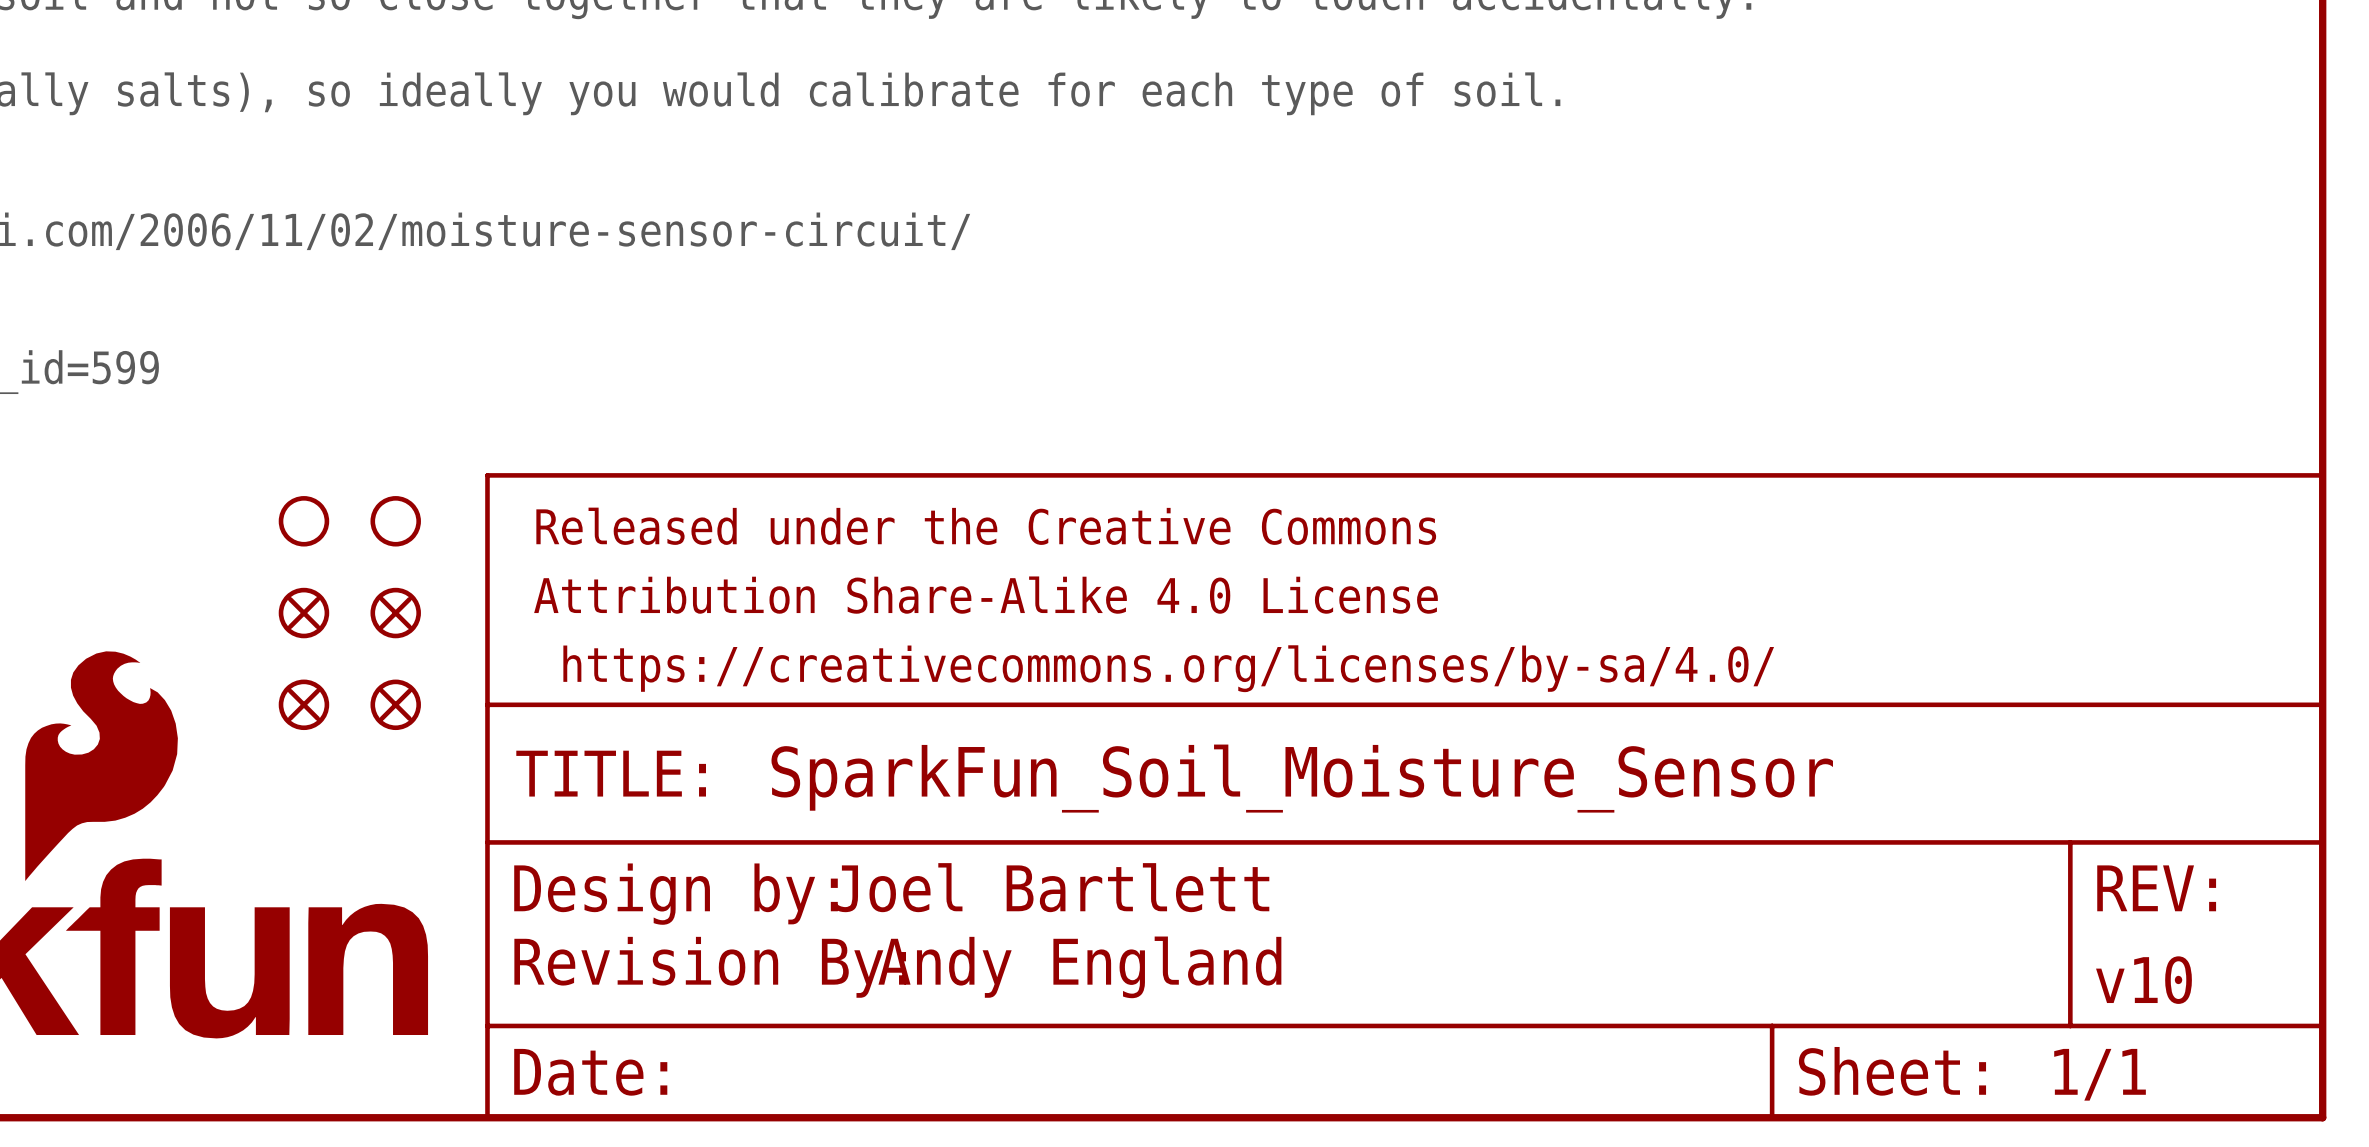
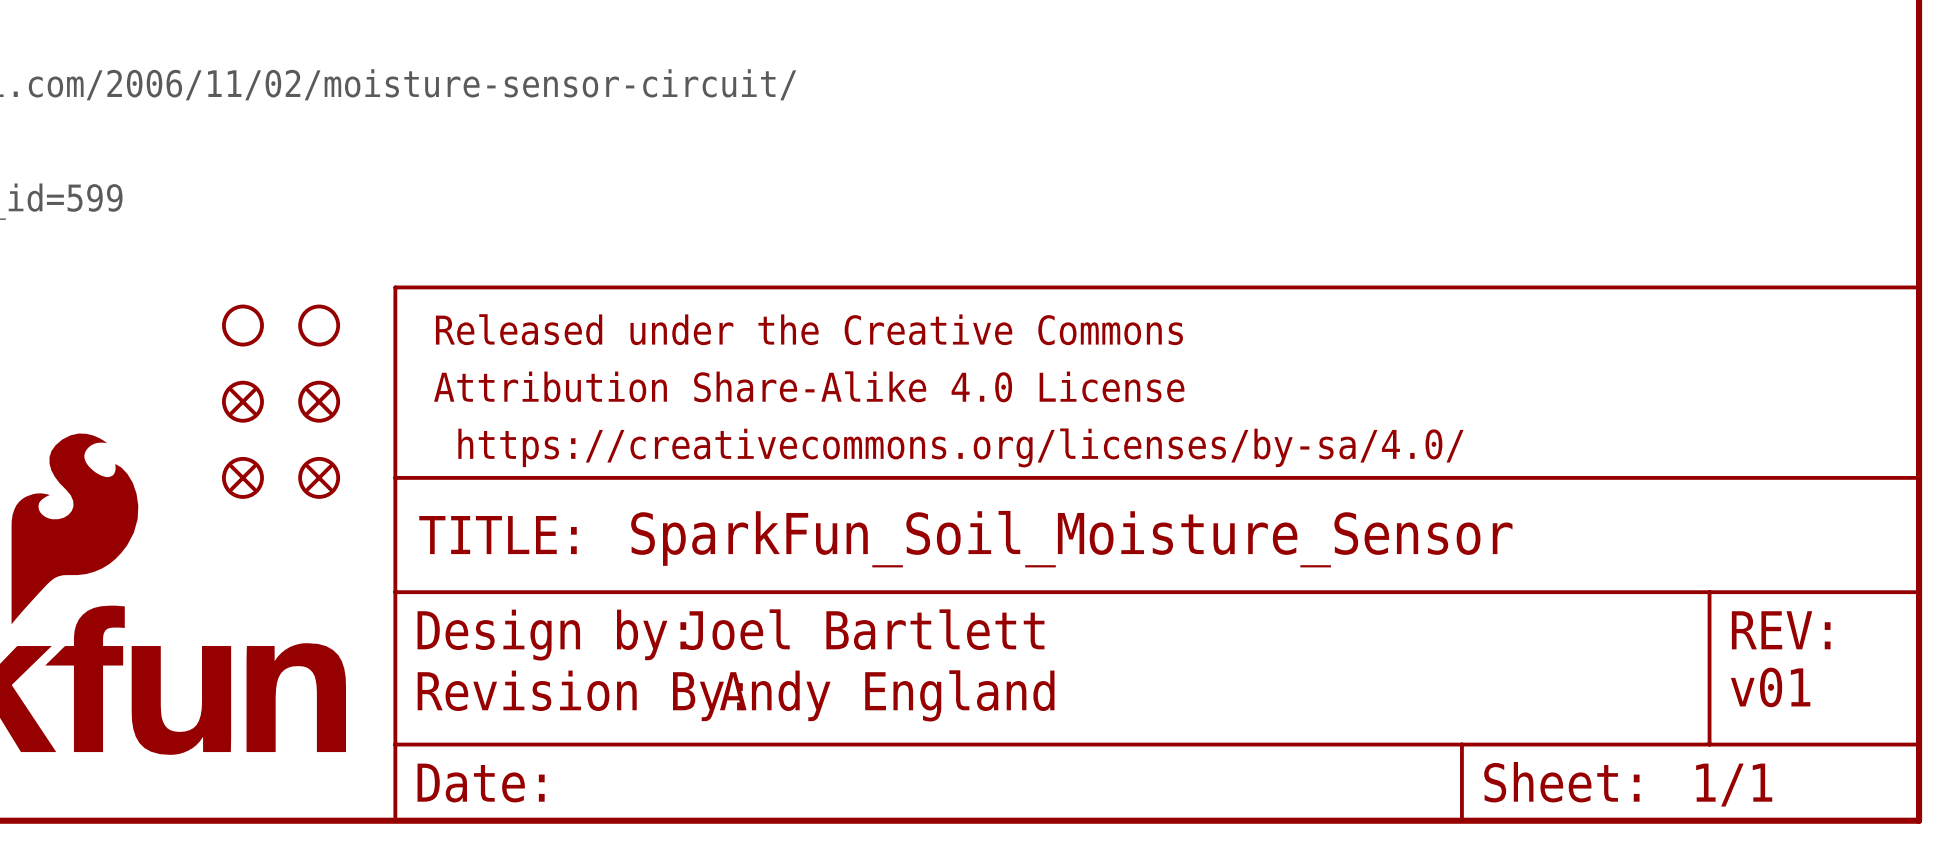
text: none -> v01 (1770, 687)
part text: v10 (2143, 980) -> none

